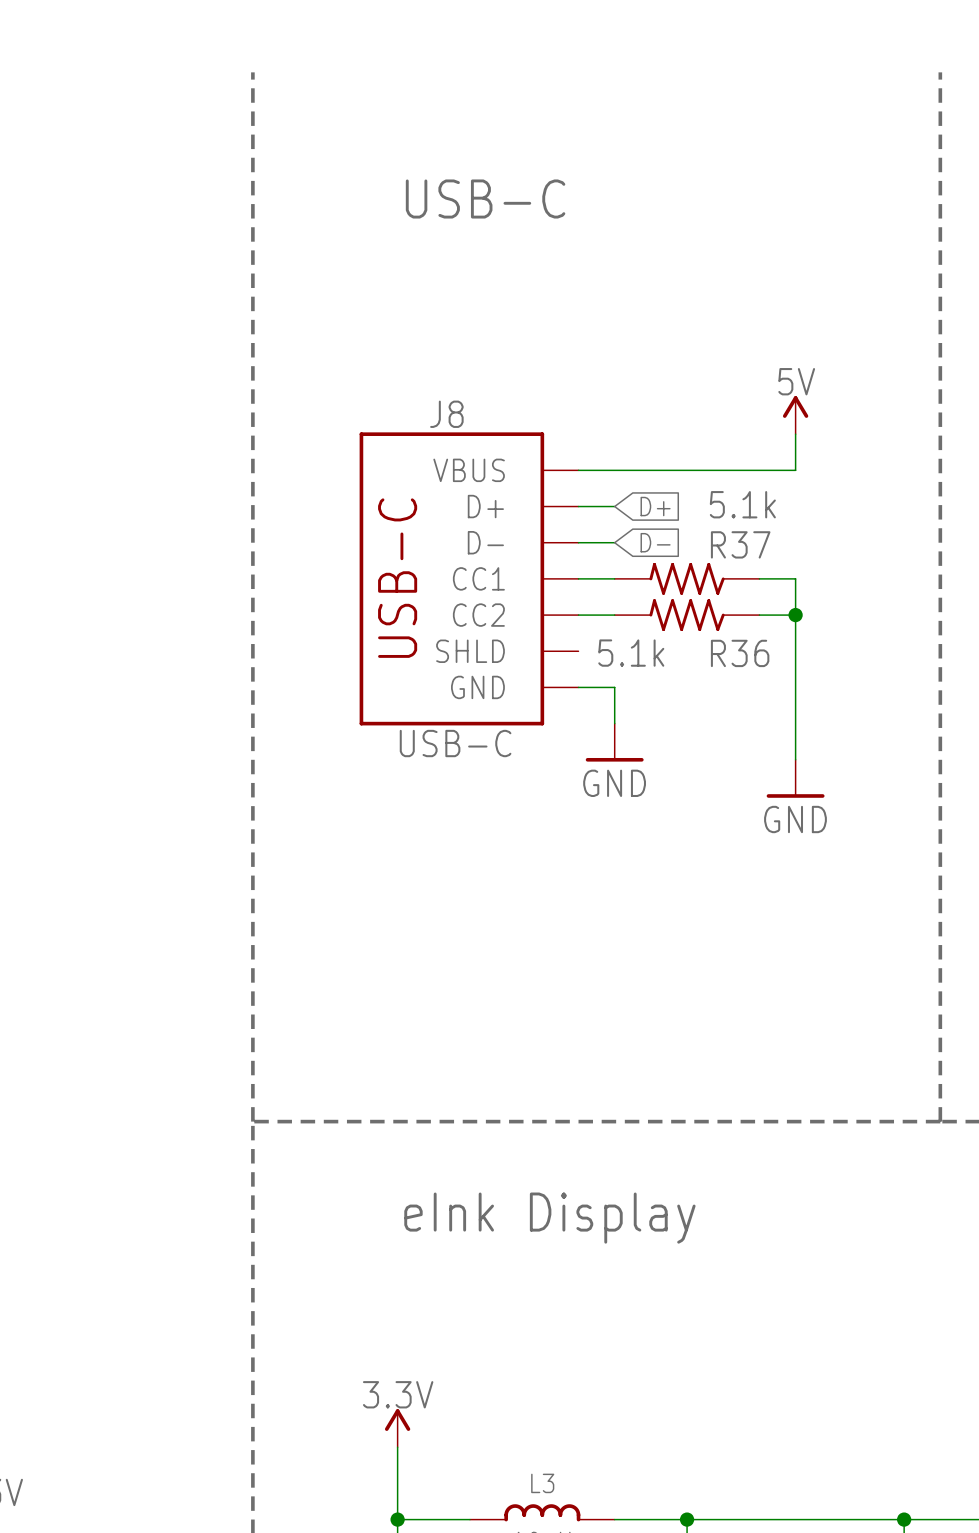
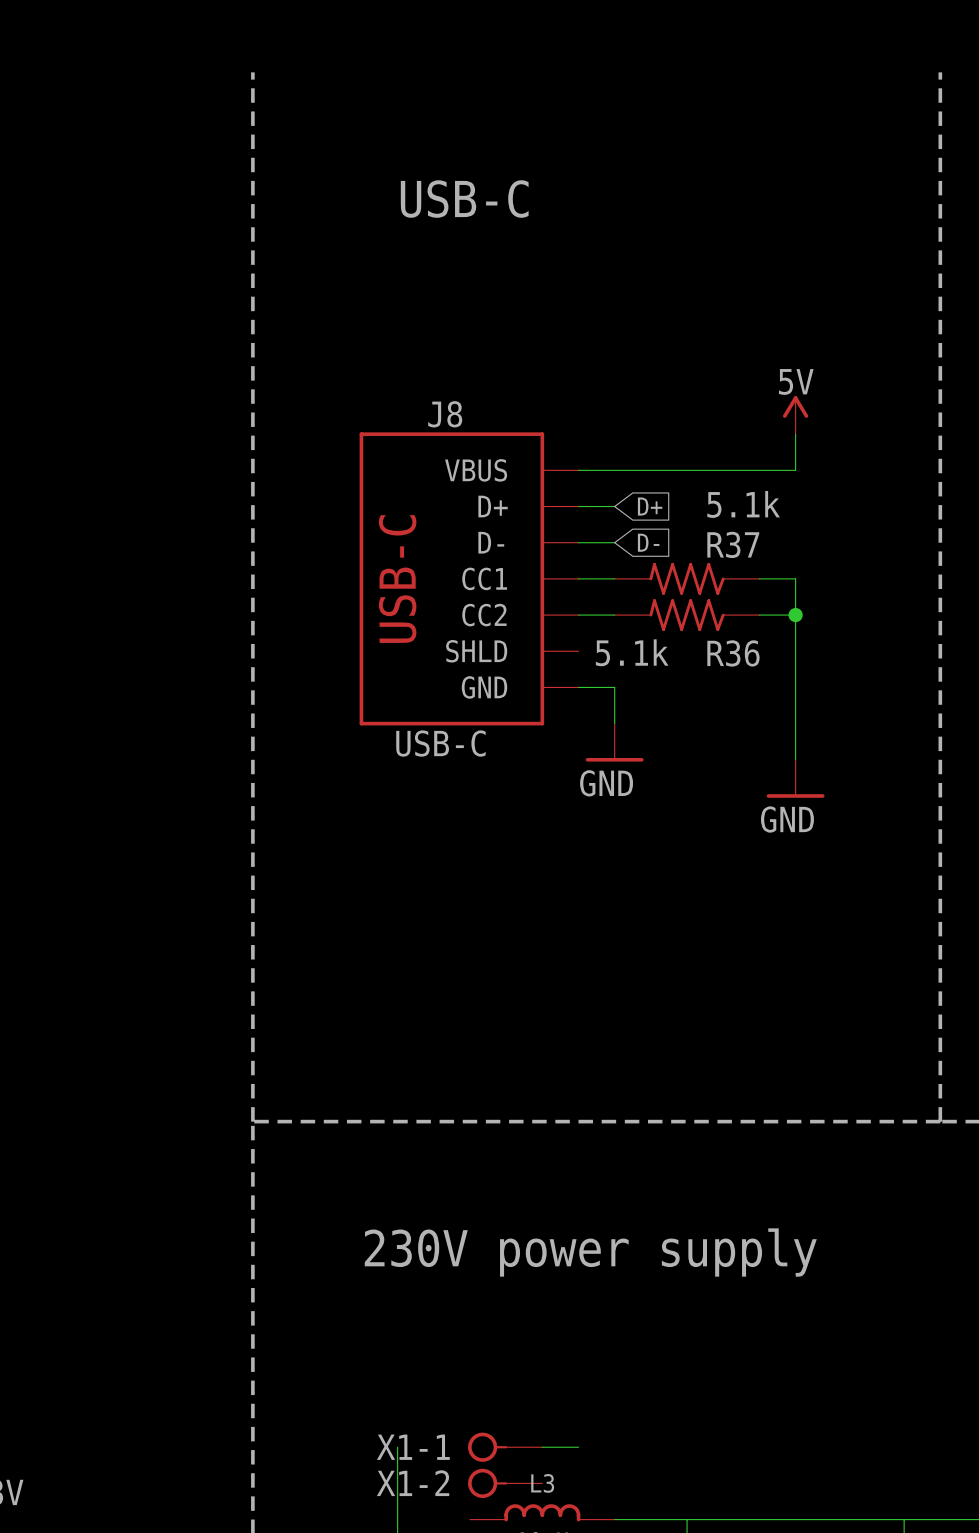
text: eInk Display (549, 1218) -> none
text: none -> 230V power supply (590, 1252)
power symbol: 3.3V (397, 1428) -> none
X1-1: none -> (505, 1447)
wire: none -> (542, 1447) (578, 1447)
X1-2: none -> (505, 1483)
wire: (397, 1519) (469, 1519) -> none
junction: (397, 1519) -> none
junction: (687, 1519) -> none
junction: (904, 1519) -> none

